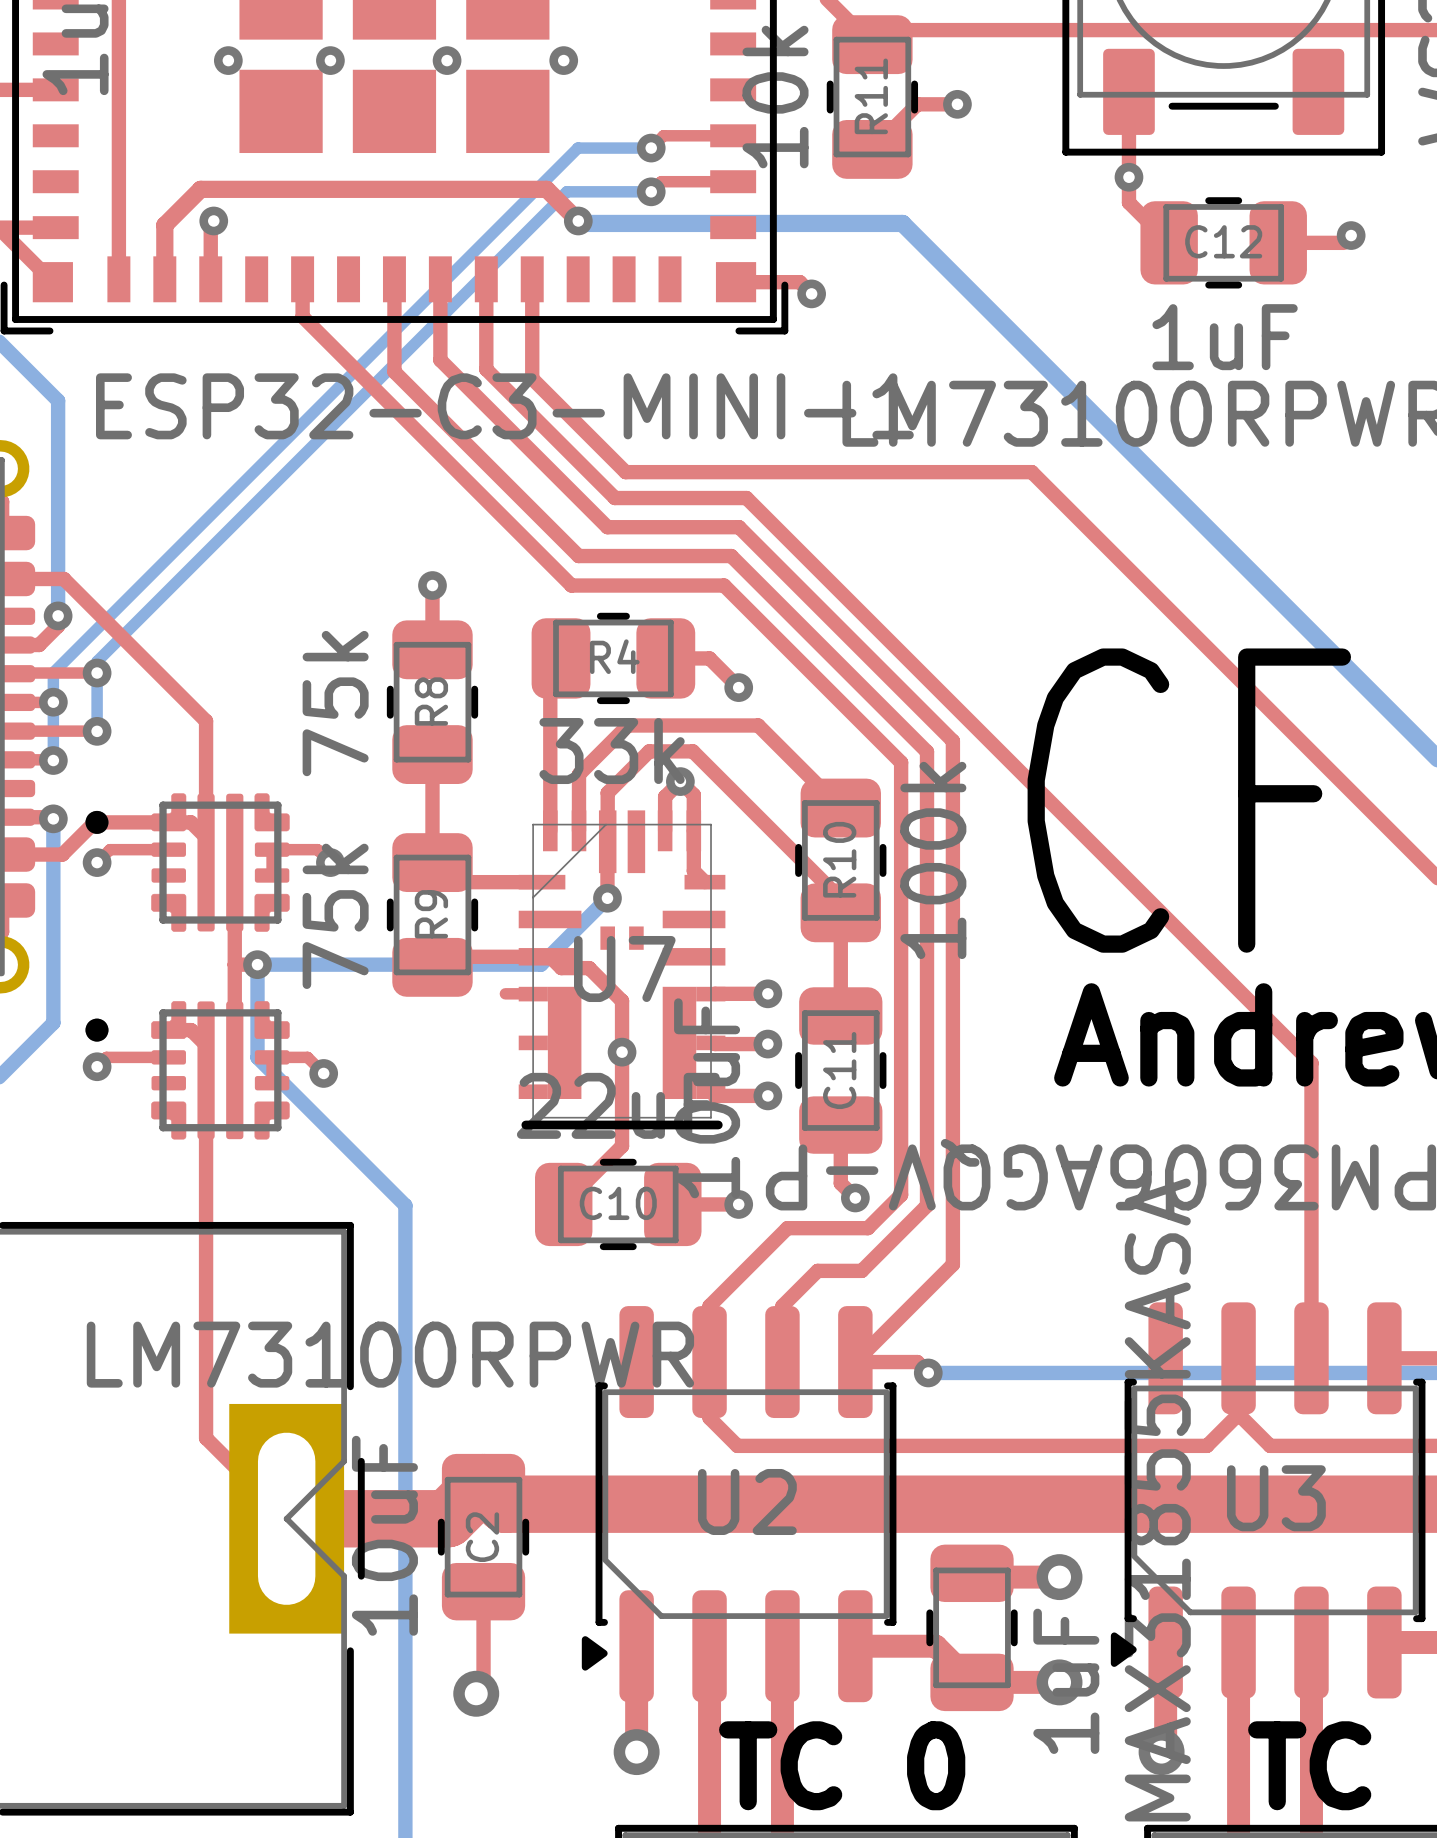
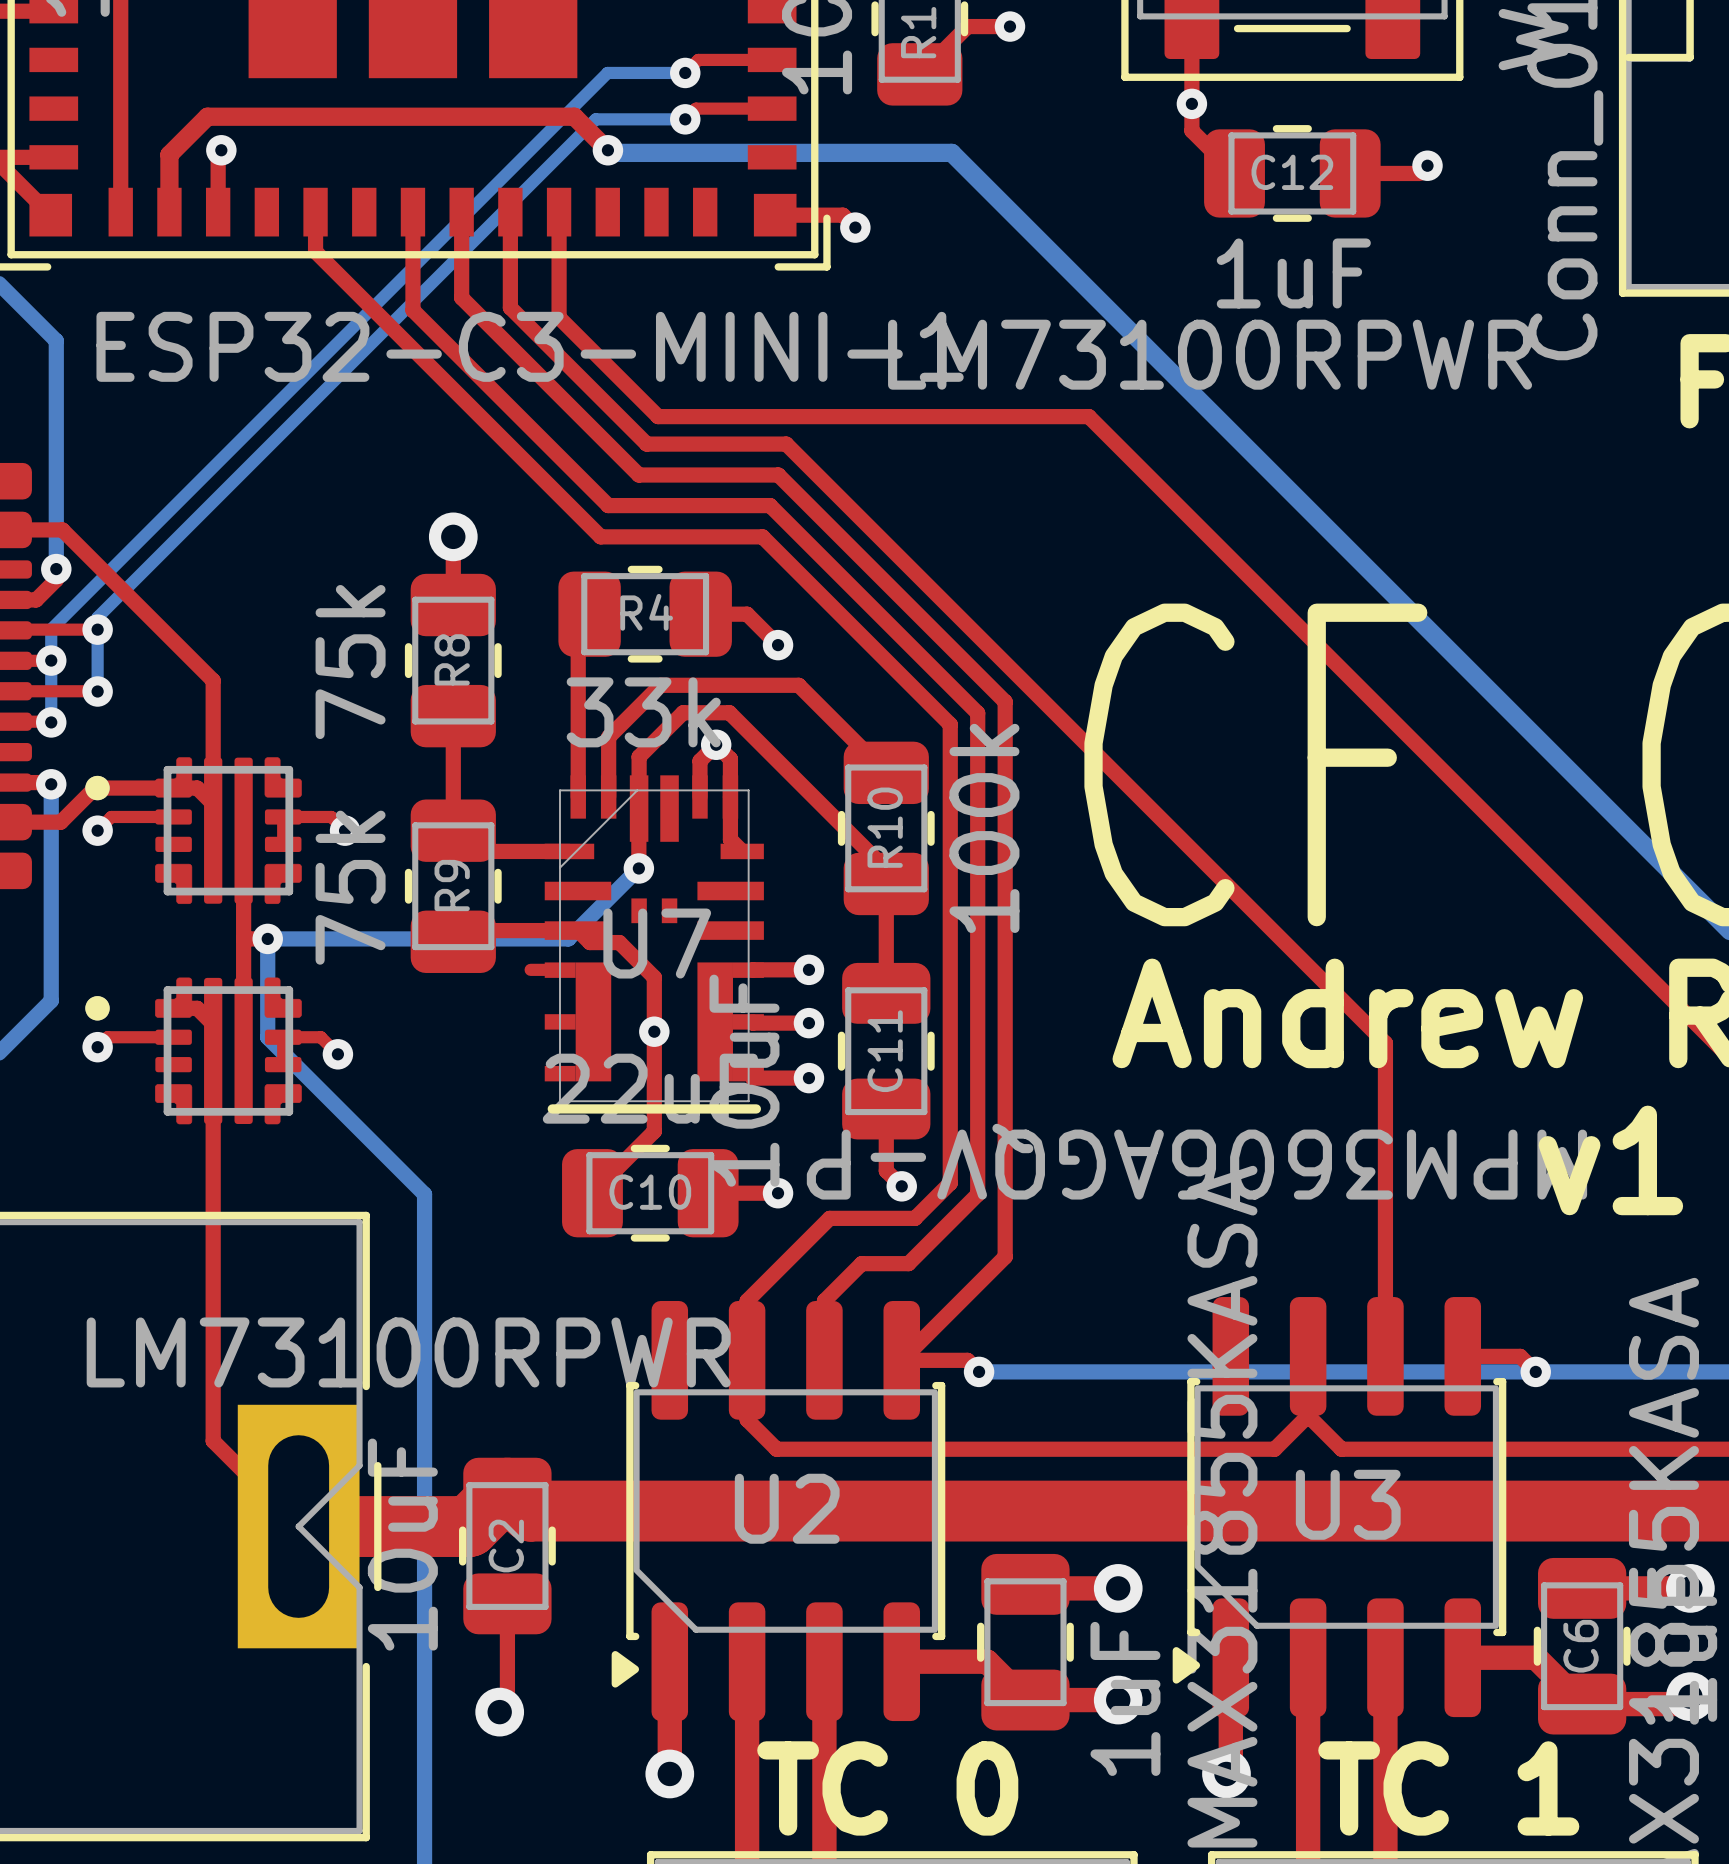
via size: [418, 571, 447, 600] -> [428, 512, 478, 562]

